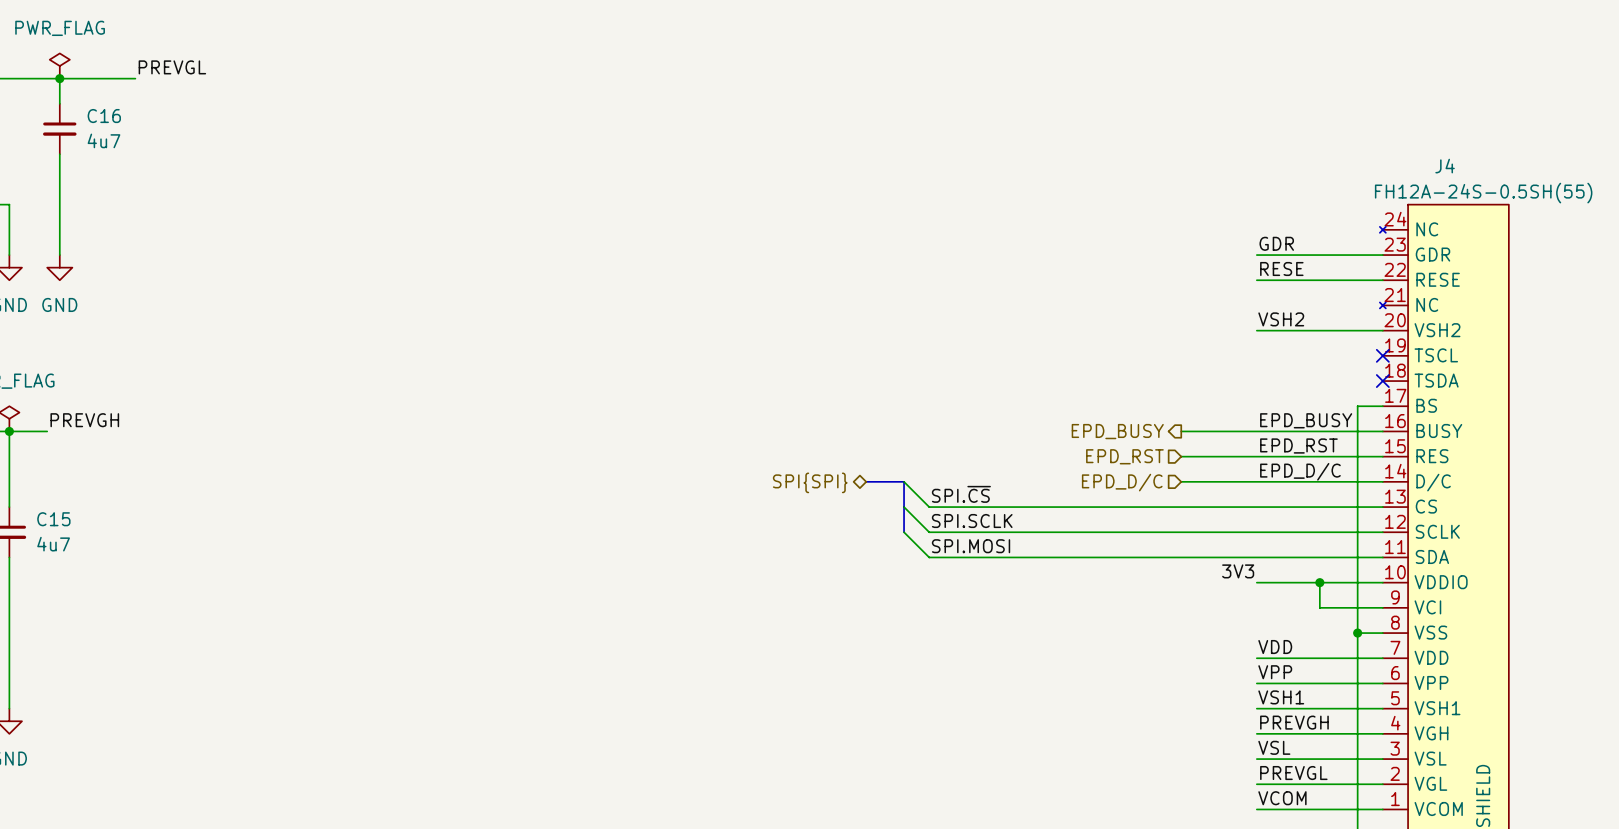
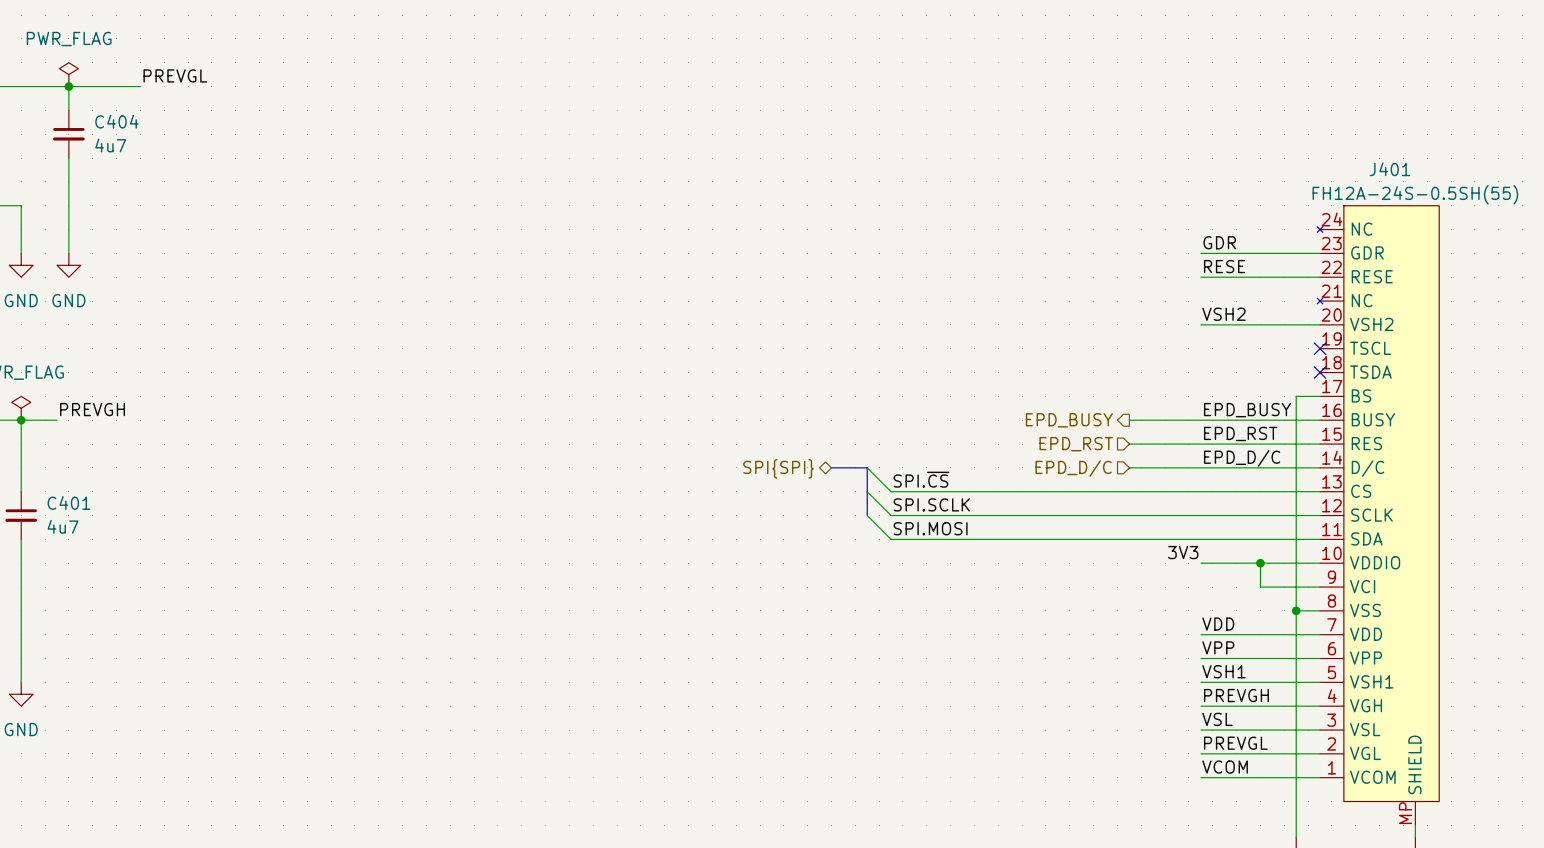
C16 name: C16 (104, 116) -> C404 (116, 121)
J4 name: J4 (1445, 166) -> J401 (1389, 169)
C15 name: C15 (53, 519) -> C401 (68, 502)

